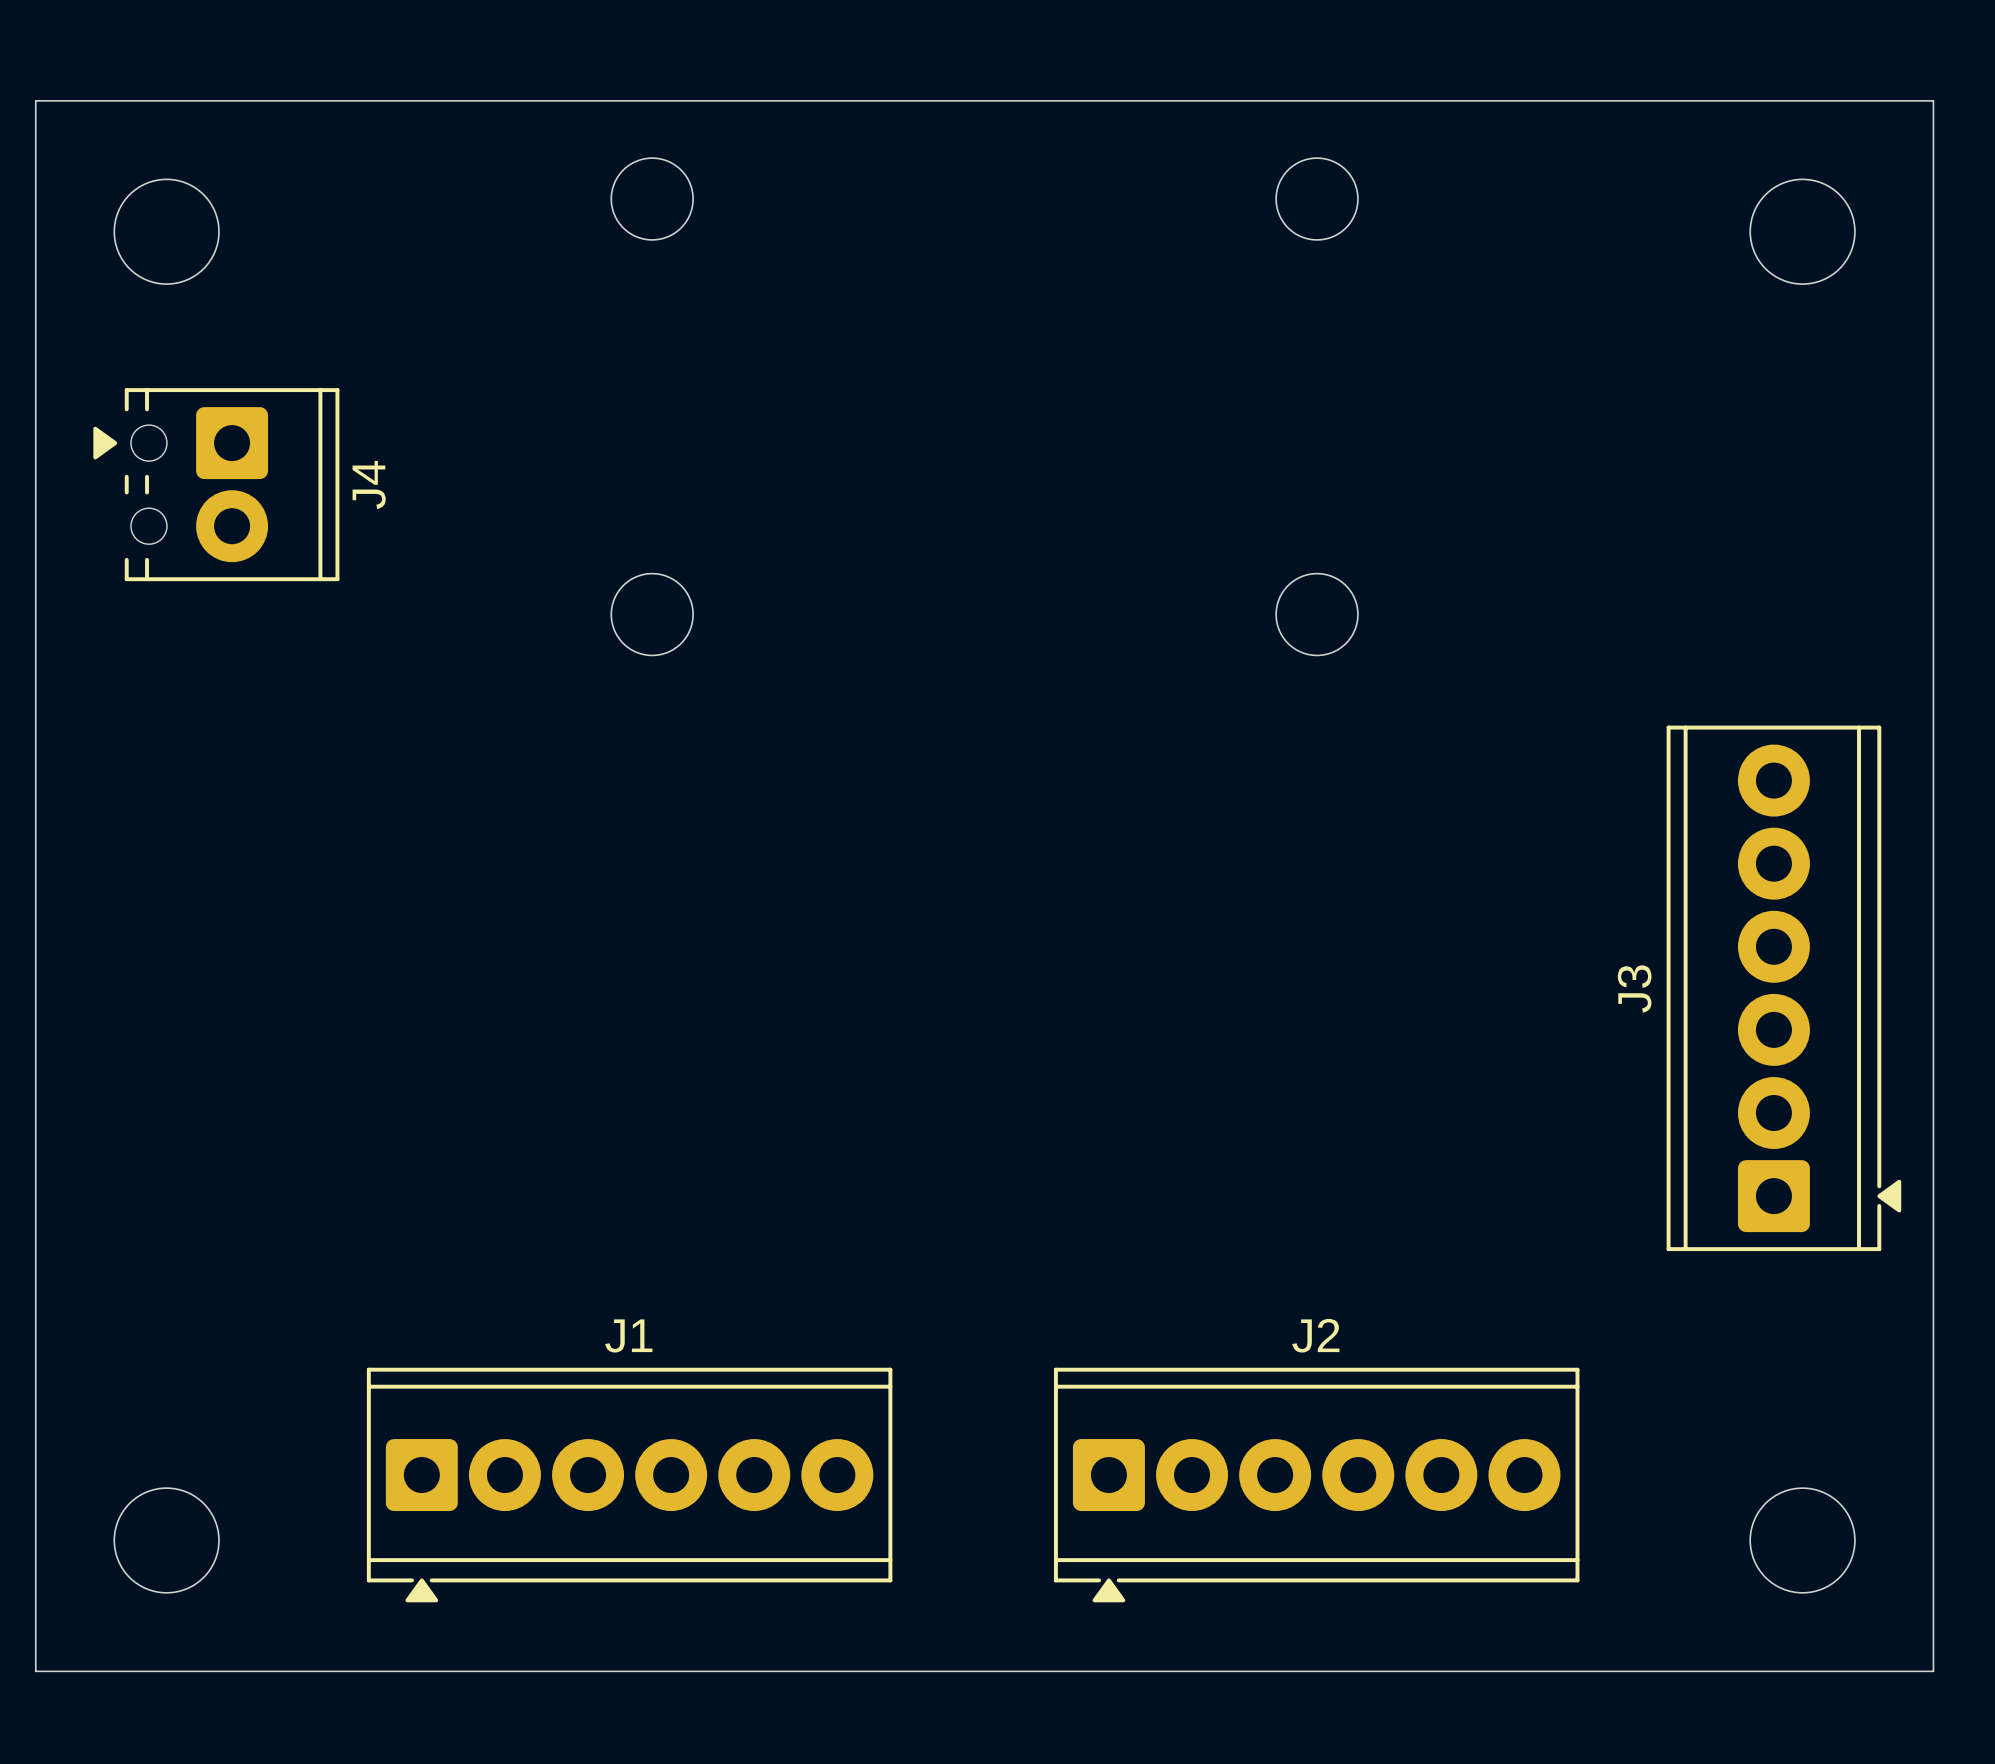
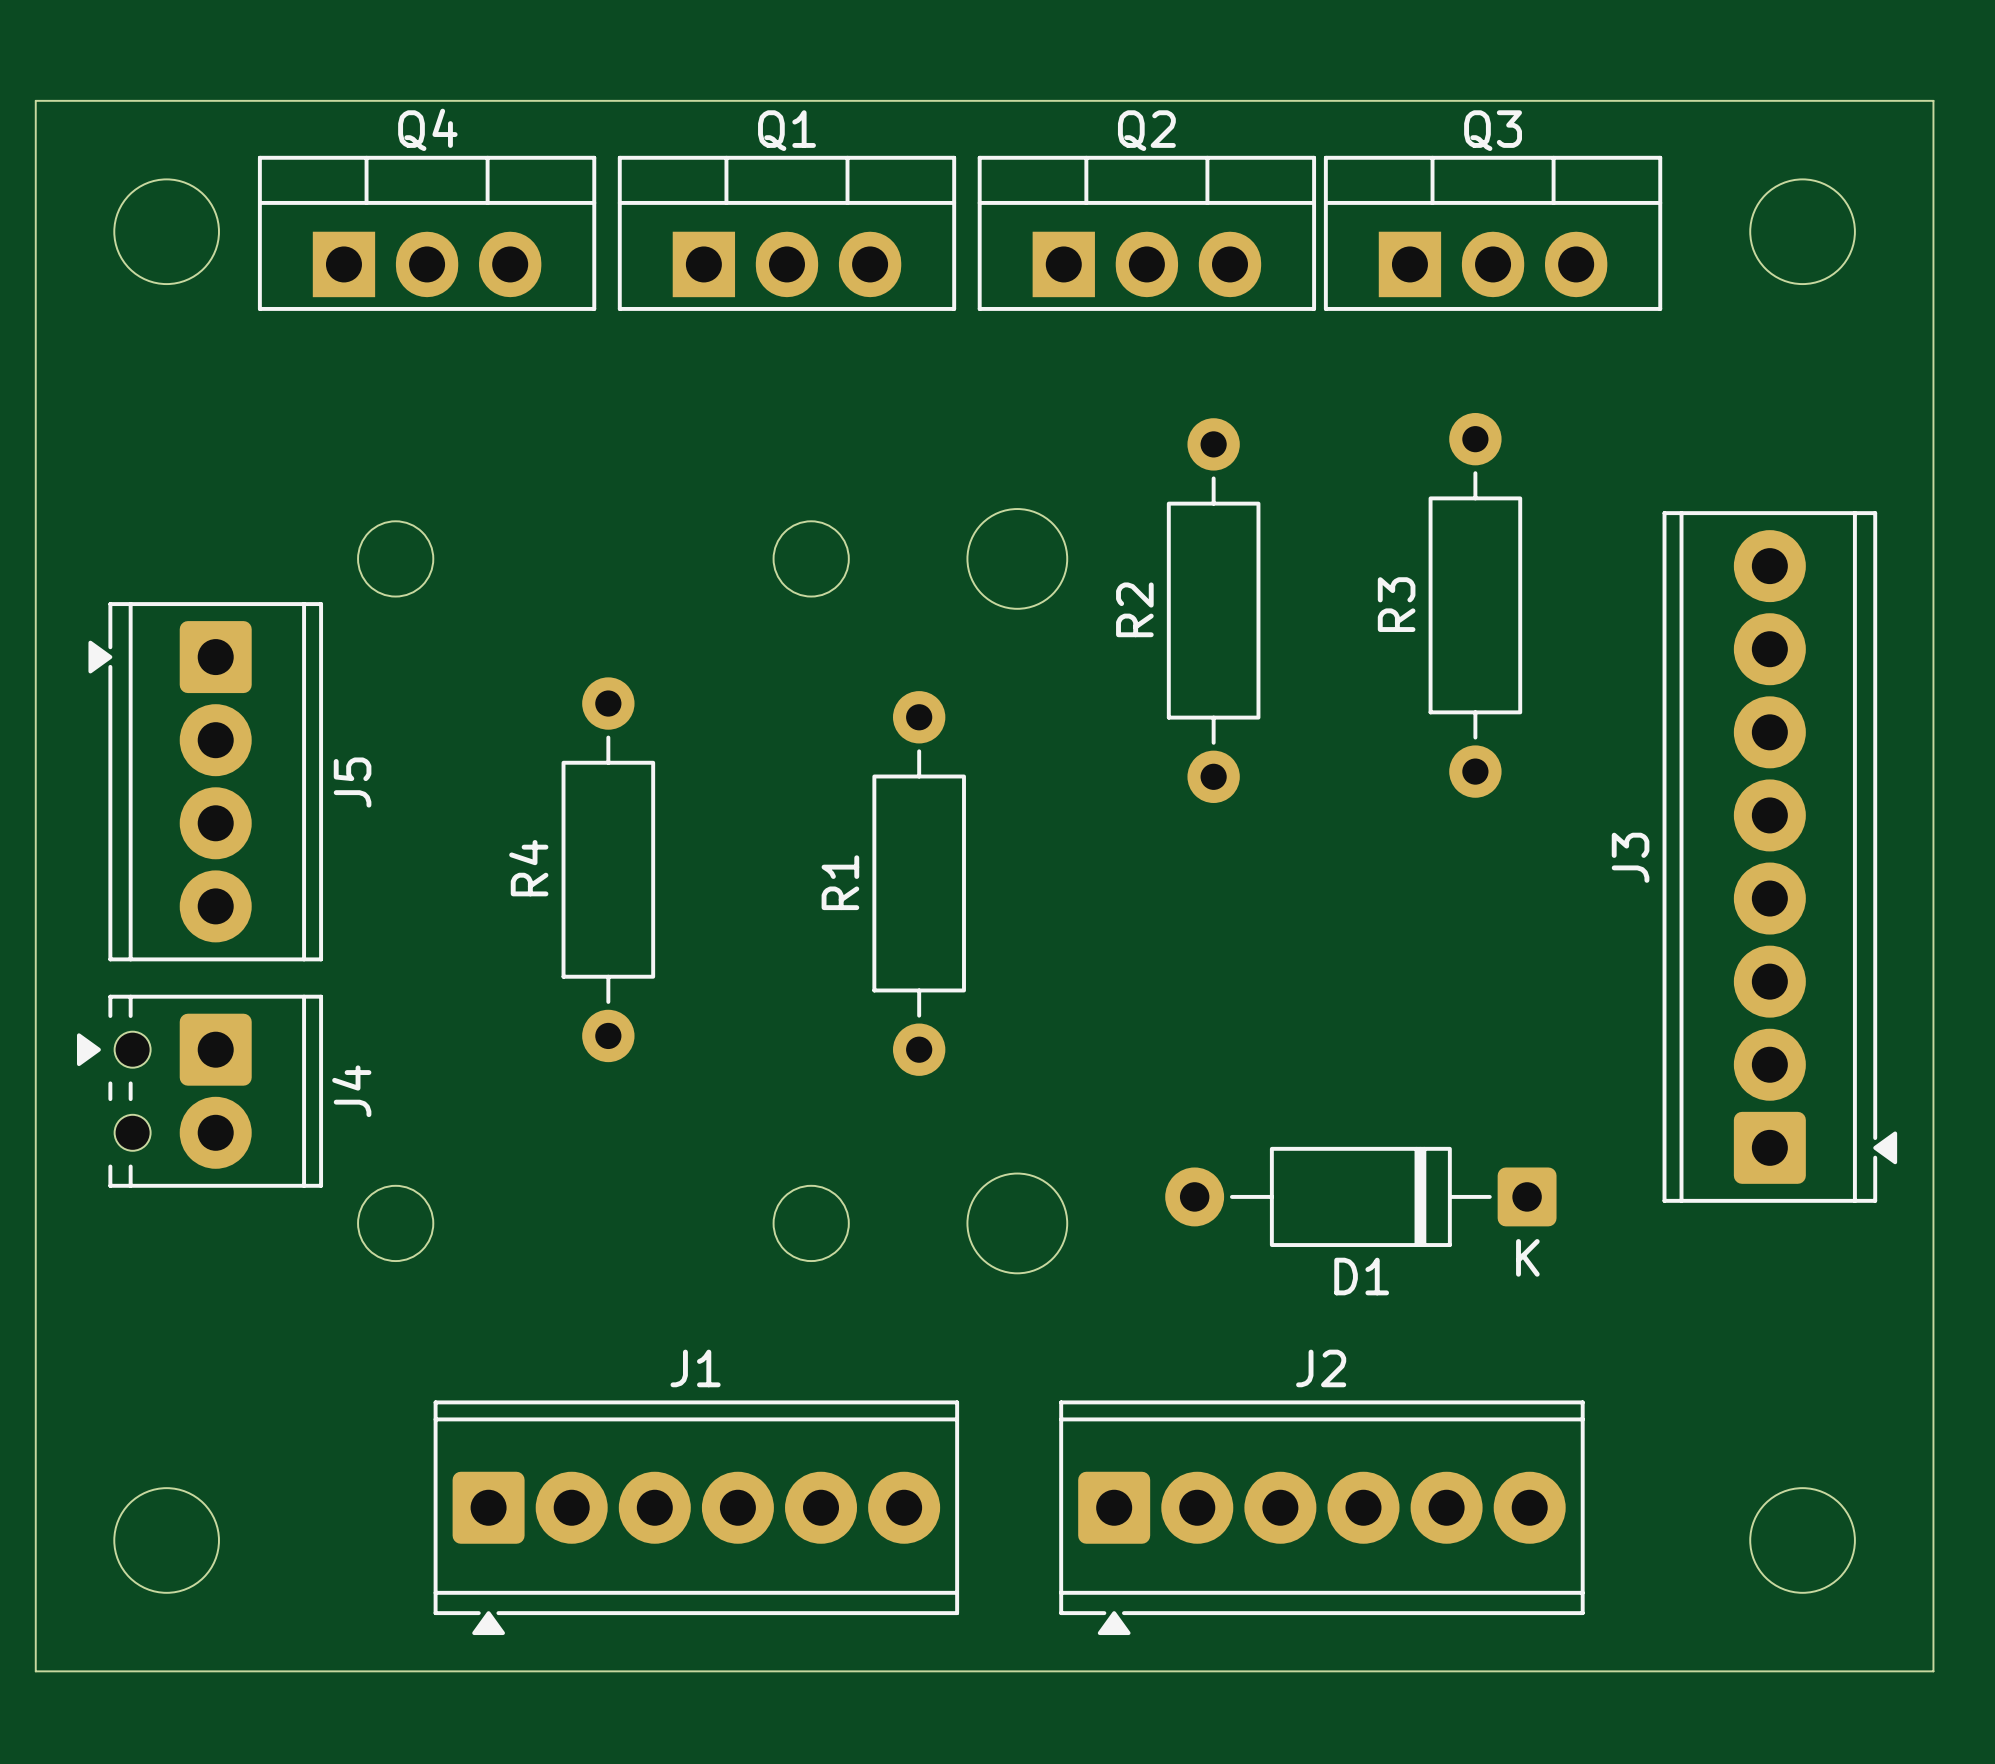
round board edge: [610, 157, 694, 241] -> none
round board edge: [1275, 157, 1359, 241] -> none
Q4: none -> (427, 233)
Q1: none -> (786, 233)
Q2: none -> (1146, 233)
Q3: none -> (1493, 233)
J4 position: (216, 484) -> (200, 1091)
round board edge: none -> [966, 508, 1069, 610]
round board edge: none -> [357, 520, 435, 598]
round board edge: none -> [772, 520, 850, 598]
round board edge: [610, 572, 694, 657] -> none
round board edge: [1275, 572, 1359, 657] -> none
R3: none -> (1475, 605)
R2: none -> (1213, 610)
J3 footprint: [1666, 725, 1902, 1252] -> [1662, 511, 1898, 1203]
J5: none -> (205, 781)
R4: none -> (608, 869)
R1: none -> (919, 883)
round board edge: none -> [966, 1172, 1069, 1275]
round board edge: none -> [357, 1184, 435, 1262]
round board edge: none -> [772, 1184, 850, 1262]
D1: none -> (1360, 1196)
J1 position: (629, 1485) -> (696, 1517)
J2 position: (1316, 1485) -> (1321, 1517)

